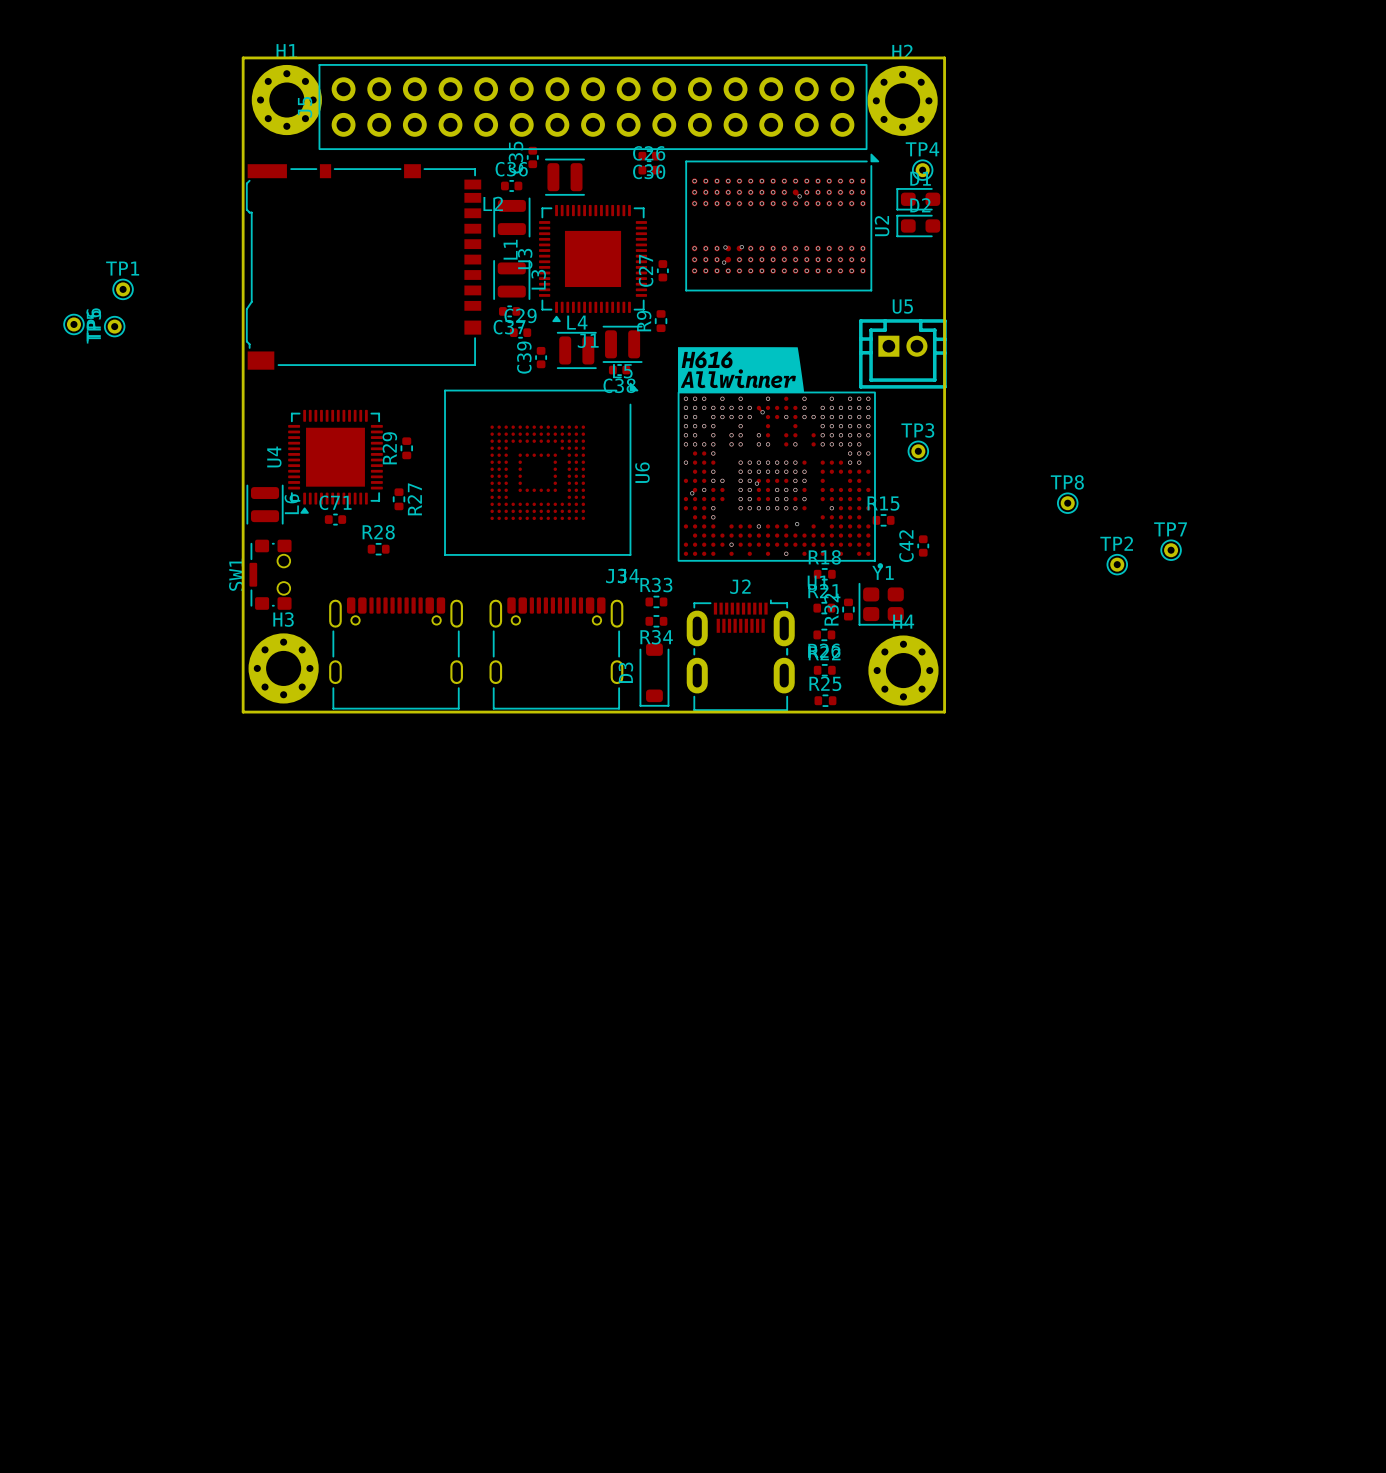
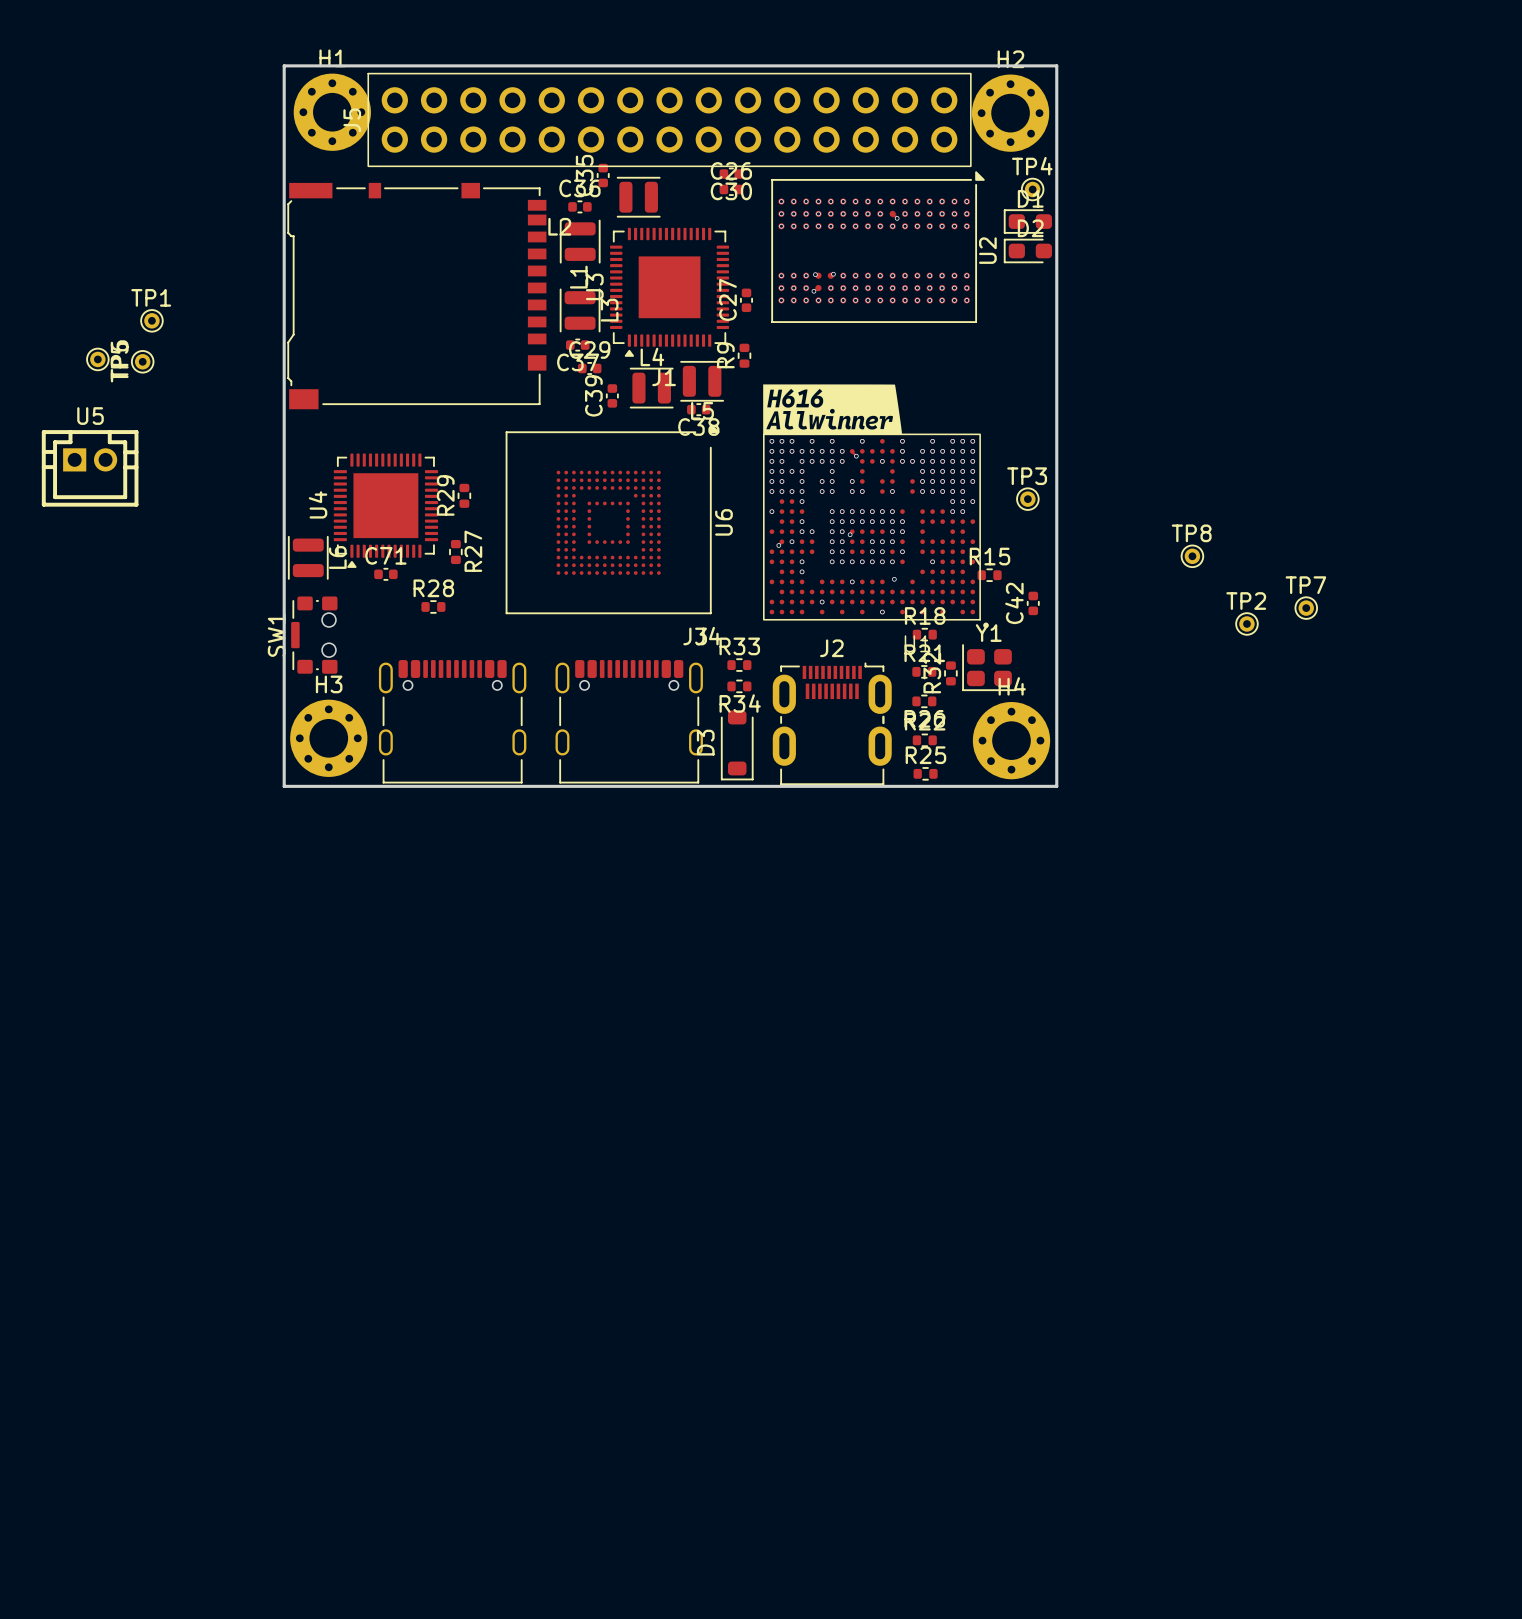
U5 position: (902, 353) -> (90, 468)

